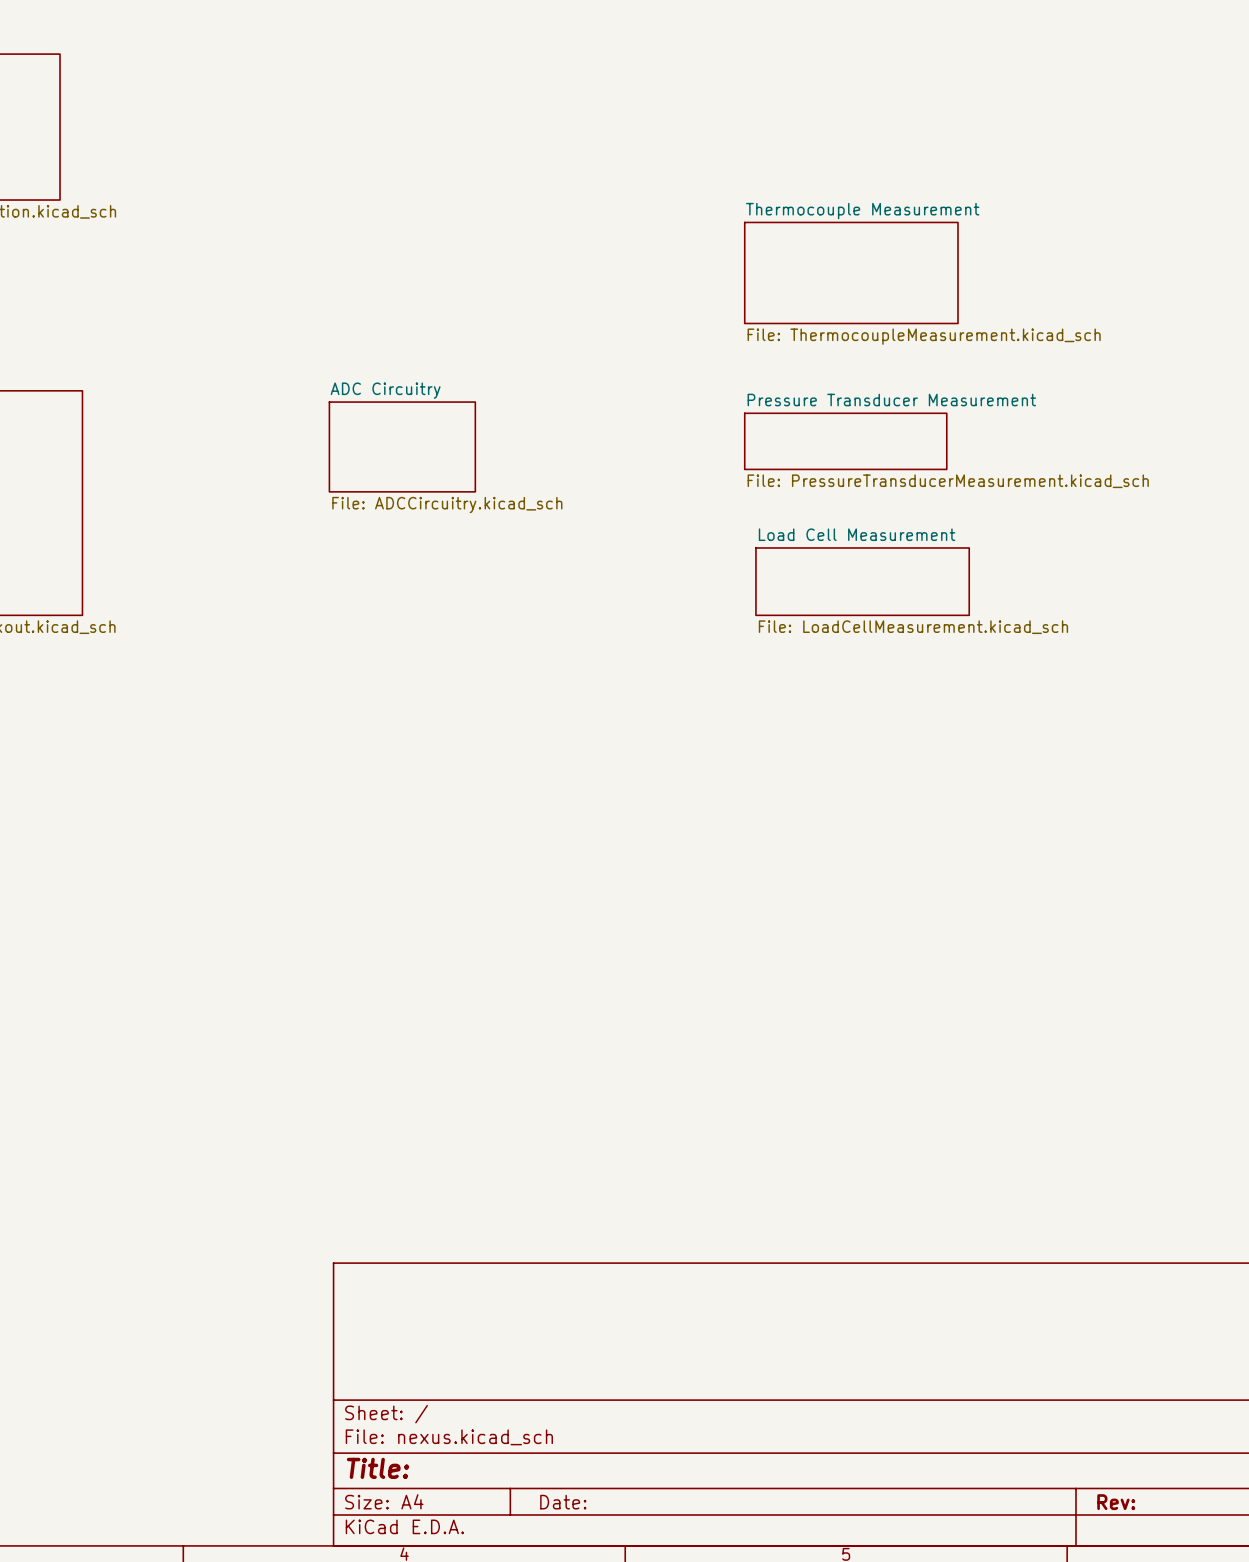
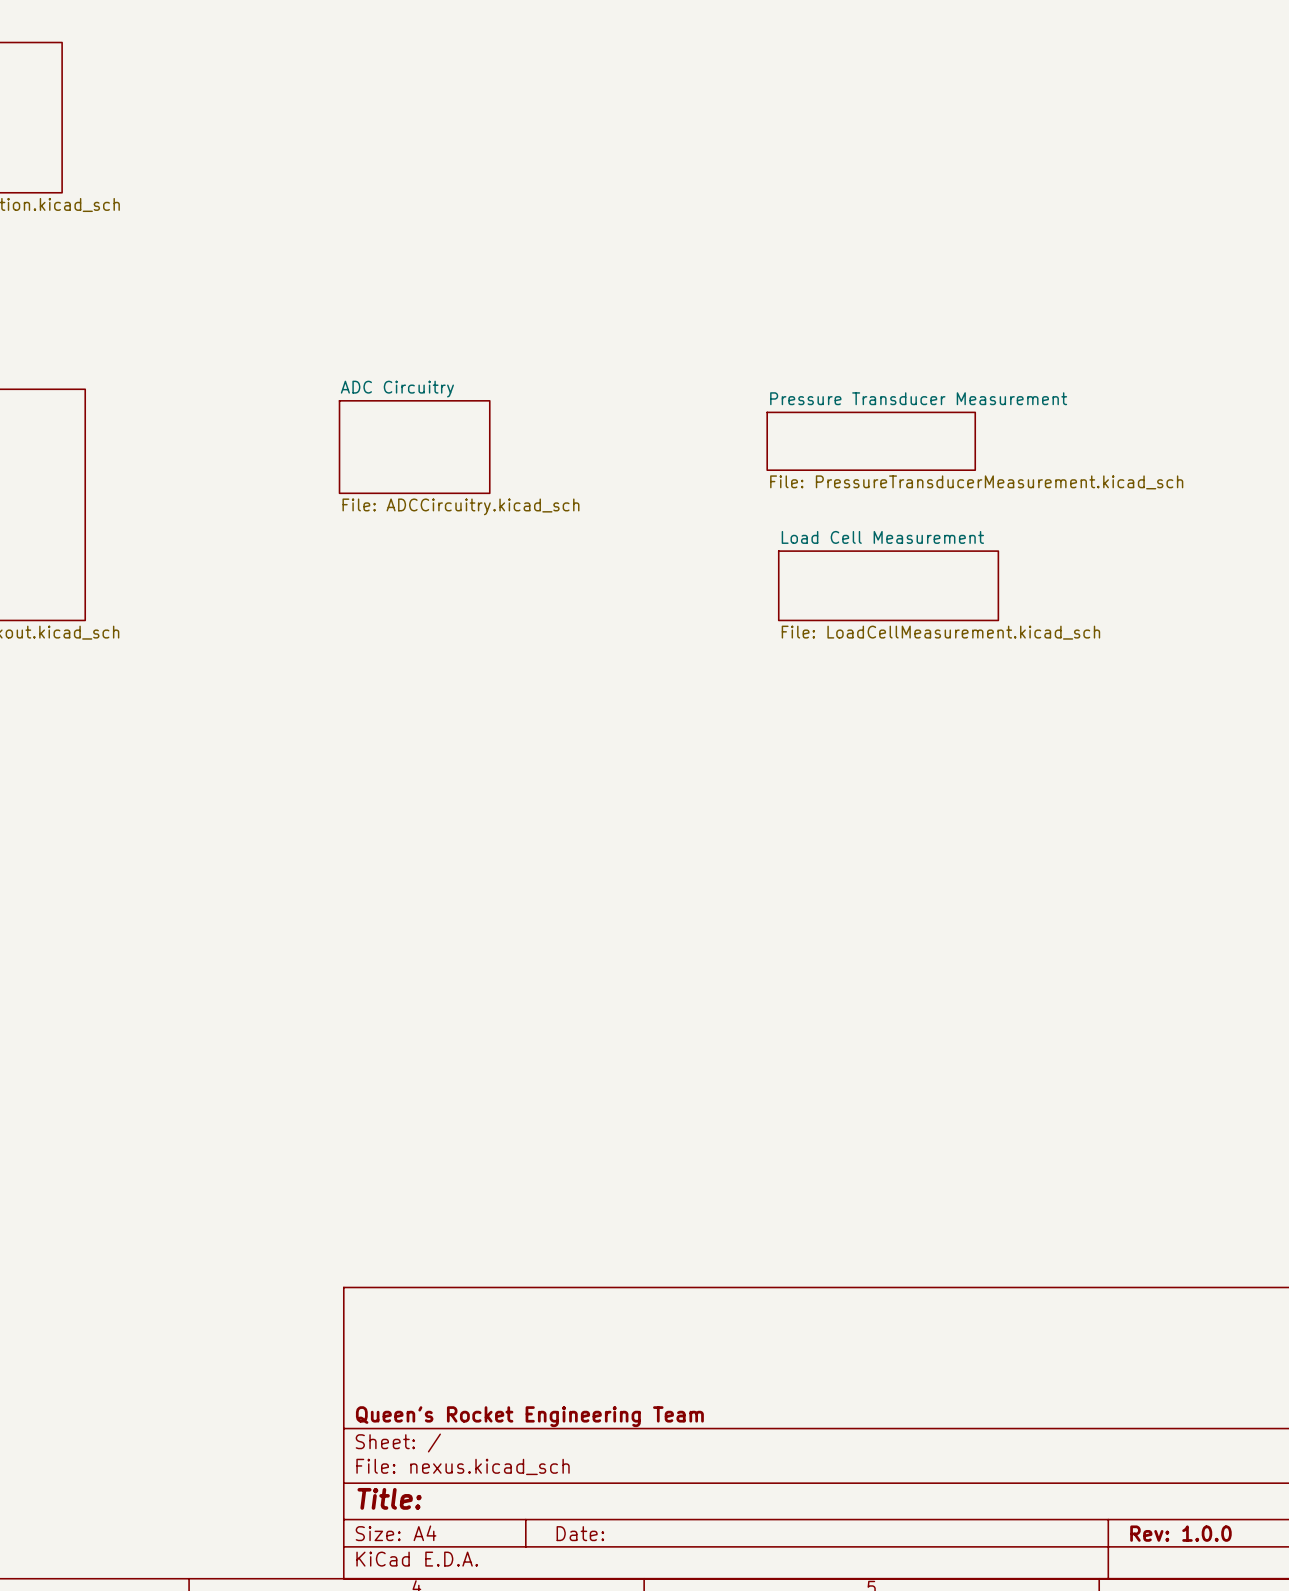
sheet Thermocouple Measurement: File: ThermocoupleMeasurement.kicad_sch (851, 272) -> none
title block: none -> Queen's Rocket Engineering Team (529, 1416)
title block: Rev: (1116, 1502) -> Rev: 1.0.0 (1180, 1533)

